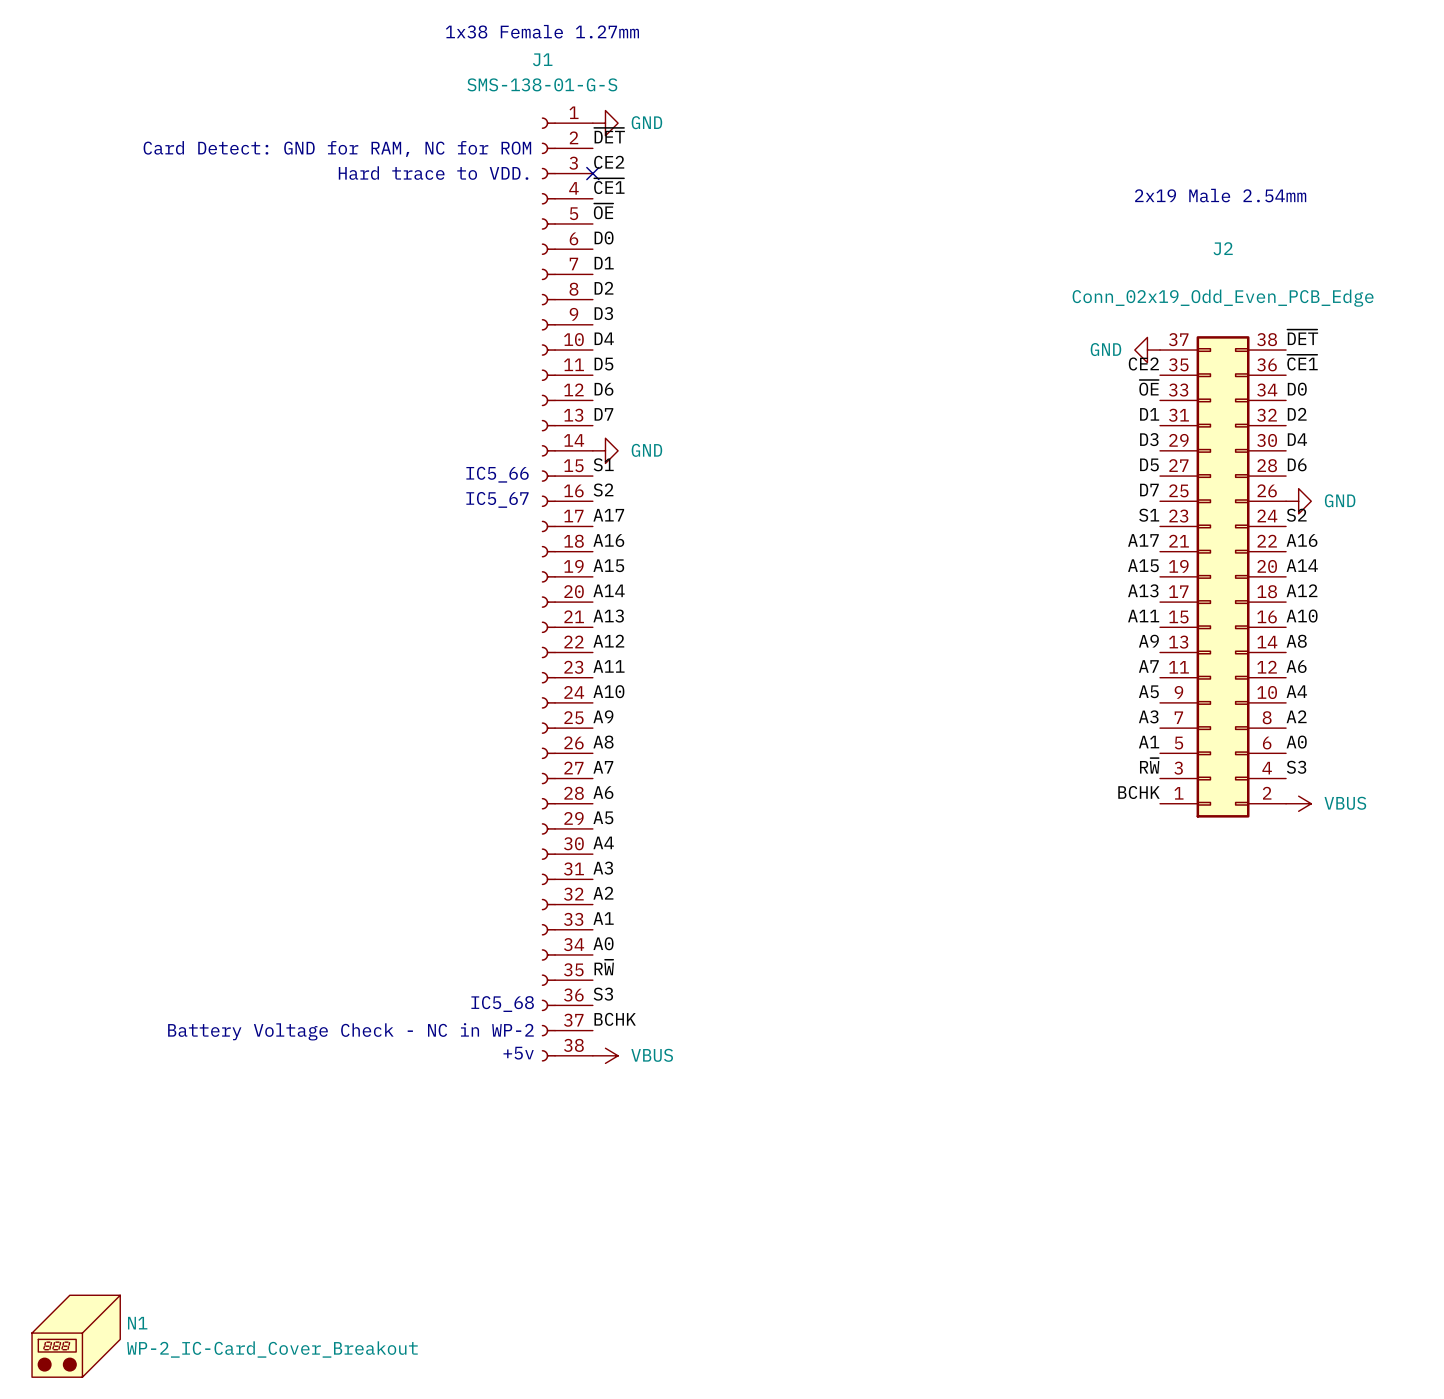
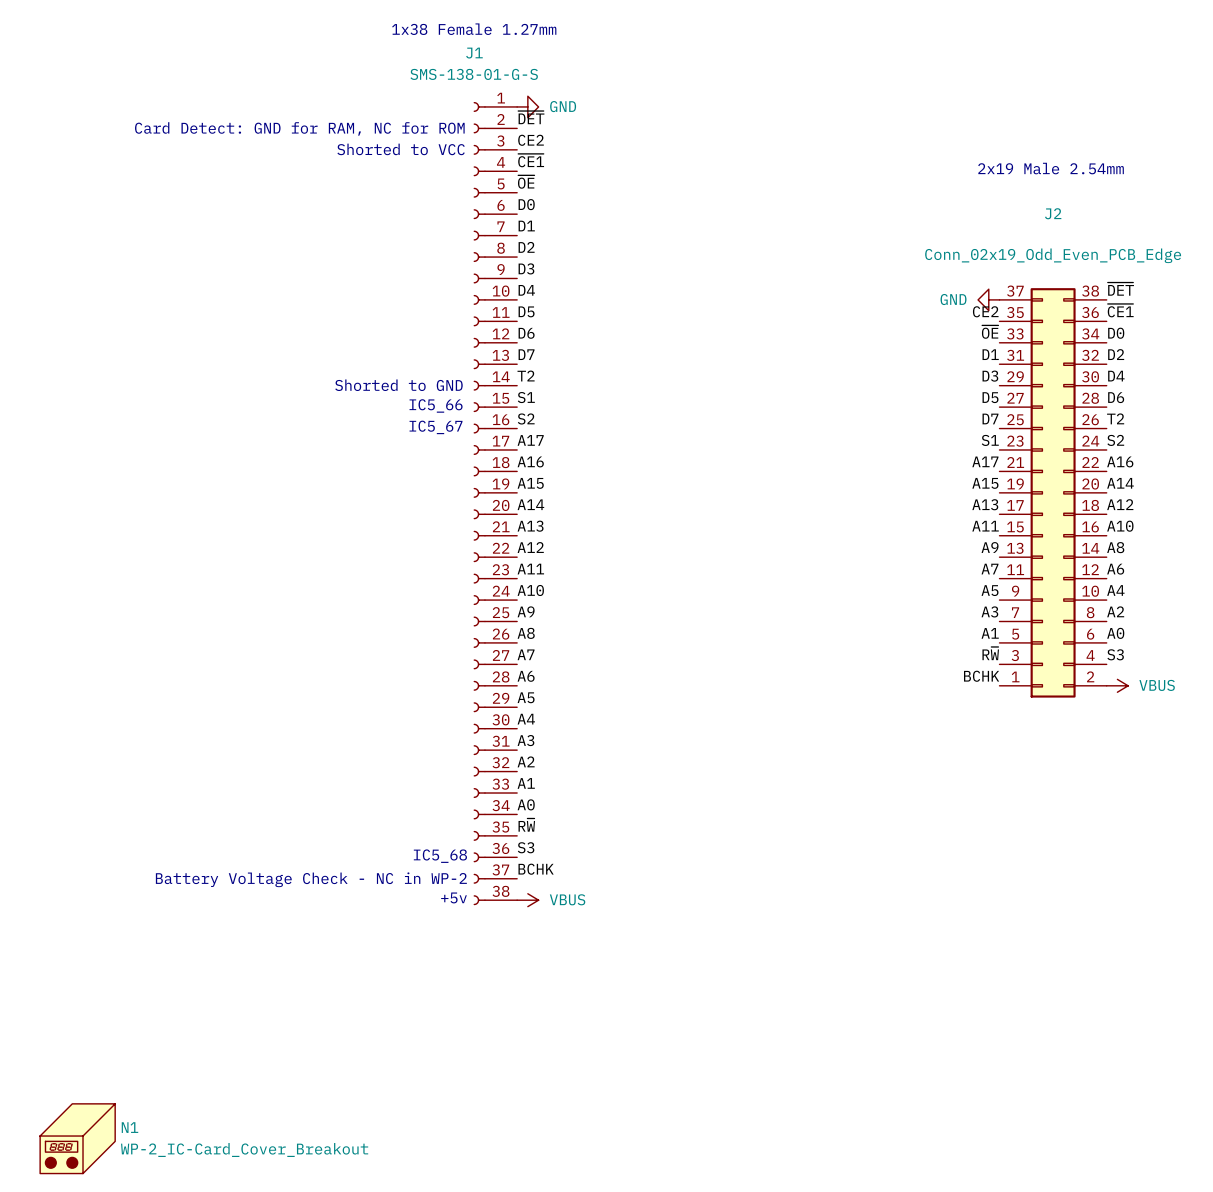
text: Hard trace to VDD. (433, 173) -> Shorted to VCC (401, 149)
no-connect mark: (592, 173) -> none
label: none -> T2 (526, 376)
text: none -> Shorted to GND (398, 385)
power symbol: GND (605, 450) -> none
label: none -> T2 (1115, 418)
power symbol: GND (1298, 501) -> none

